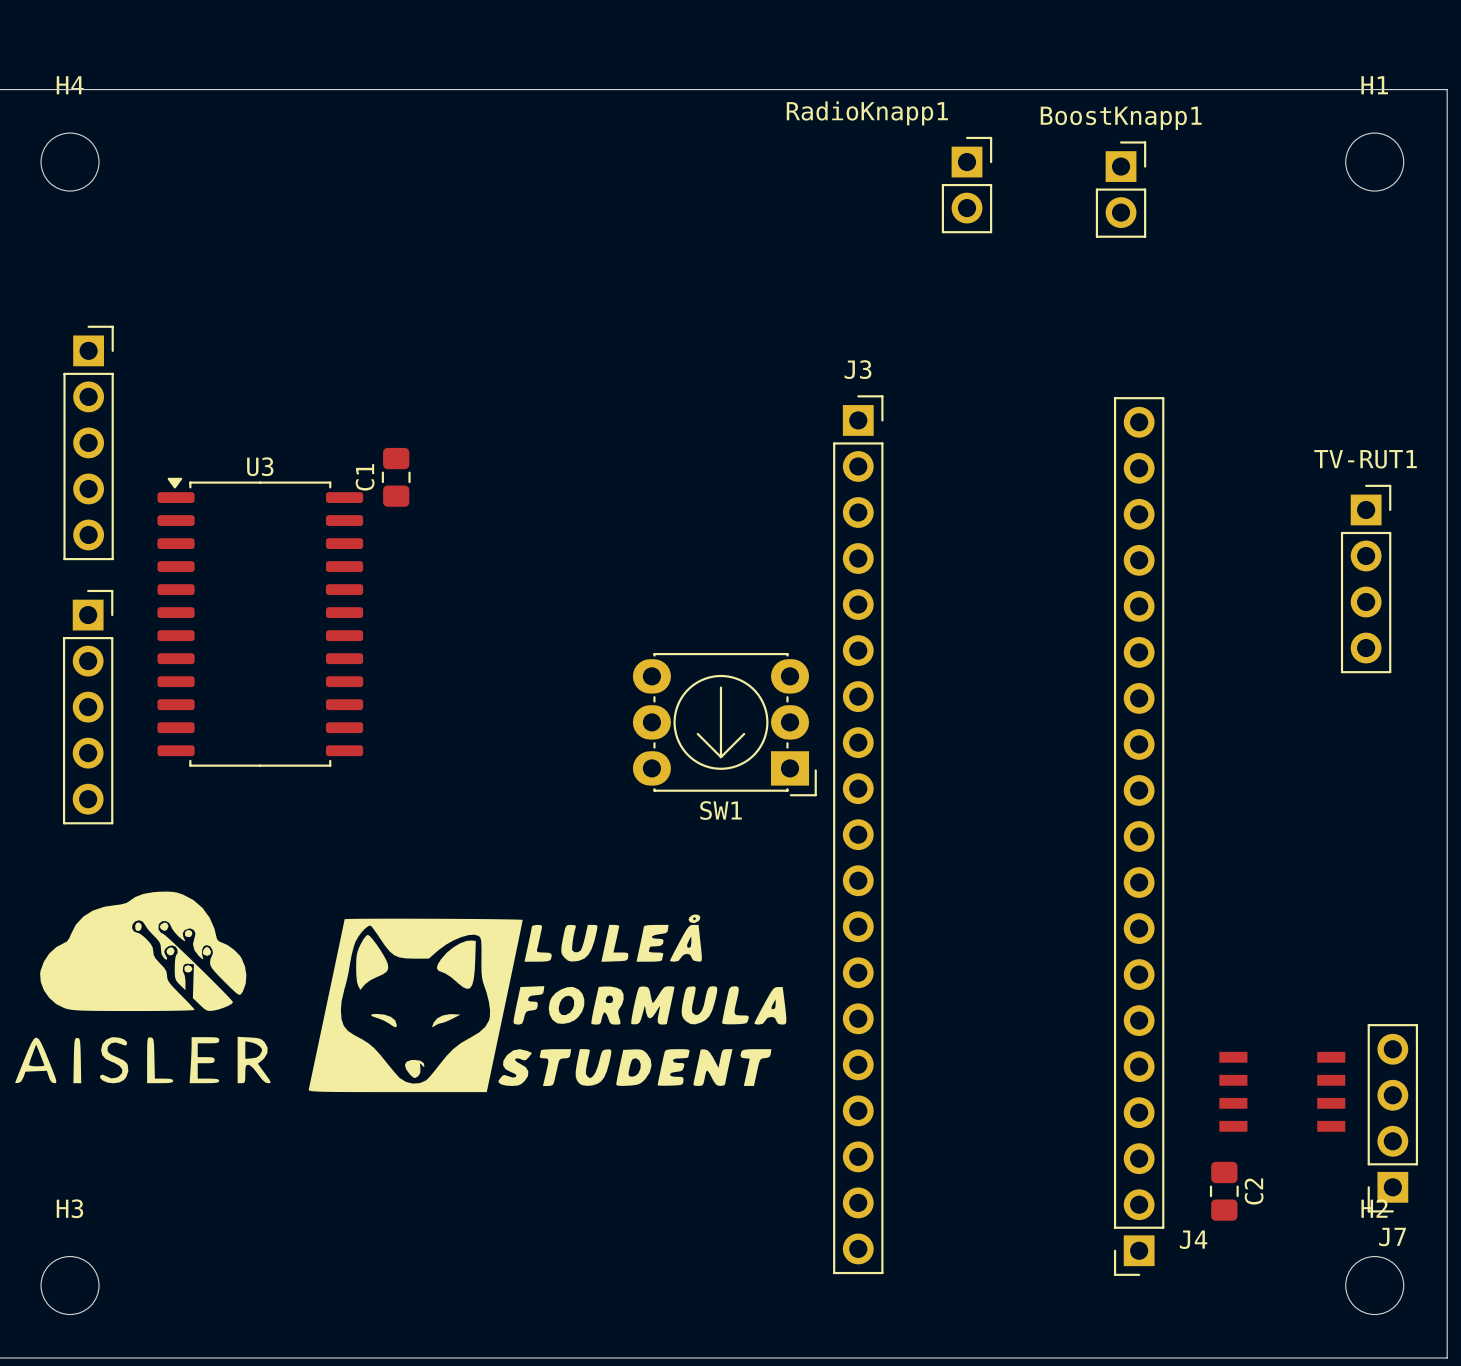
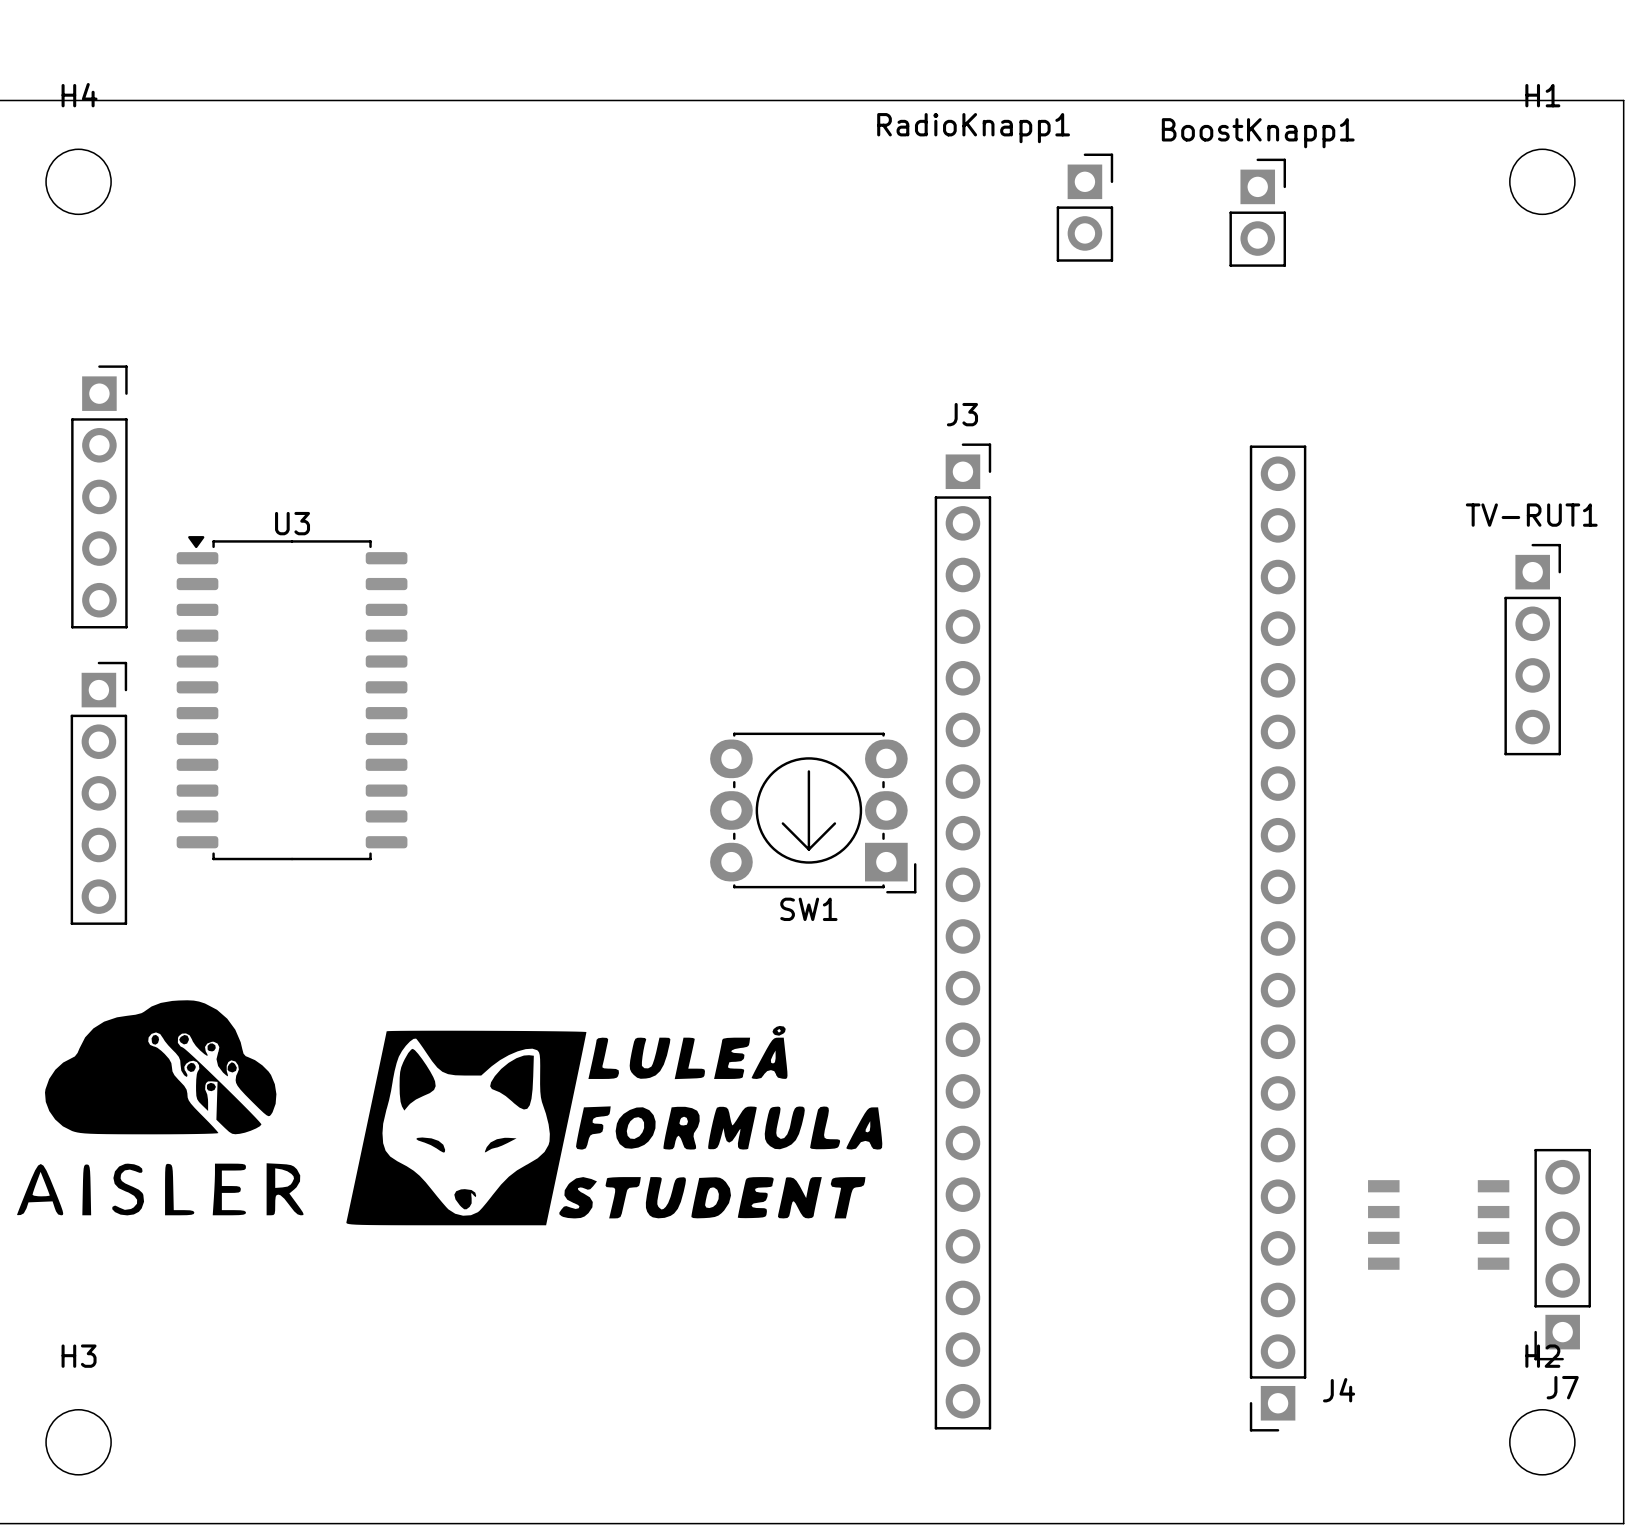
C1: (396, 477) -> none
C2: (1224, 1191) -> none

